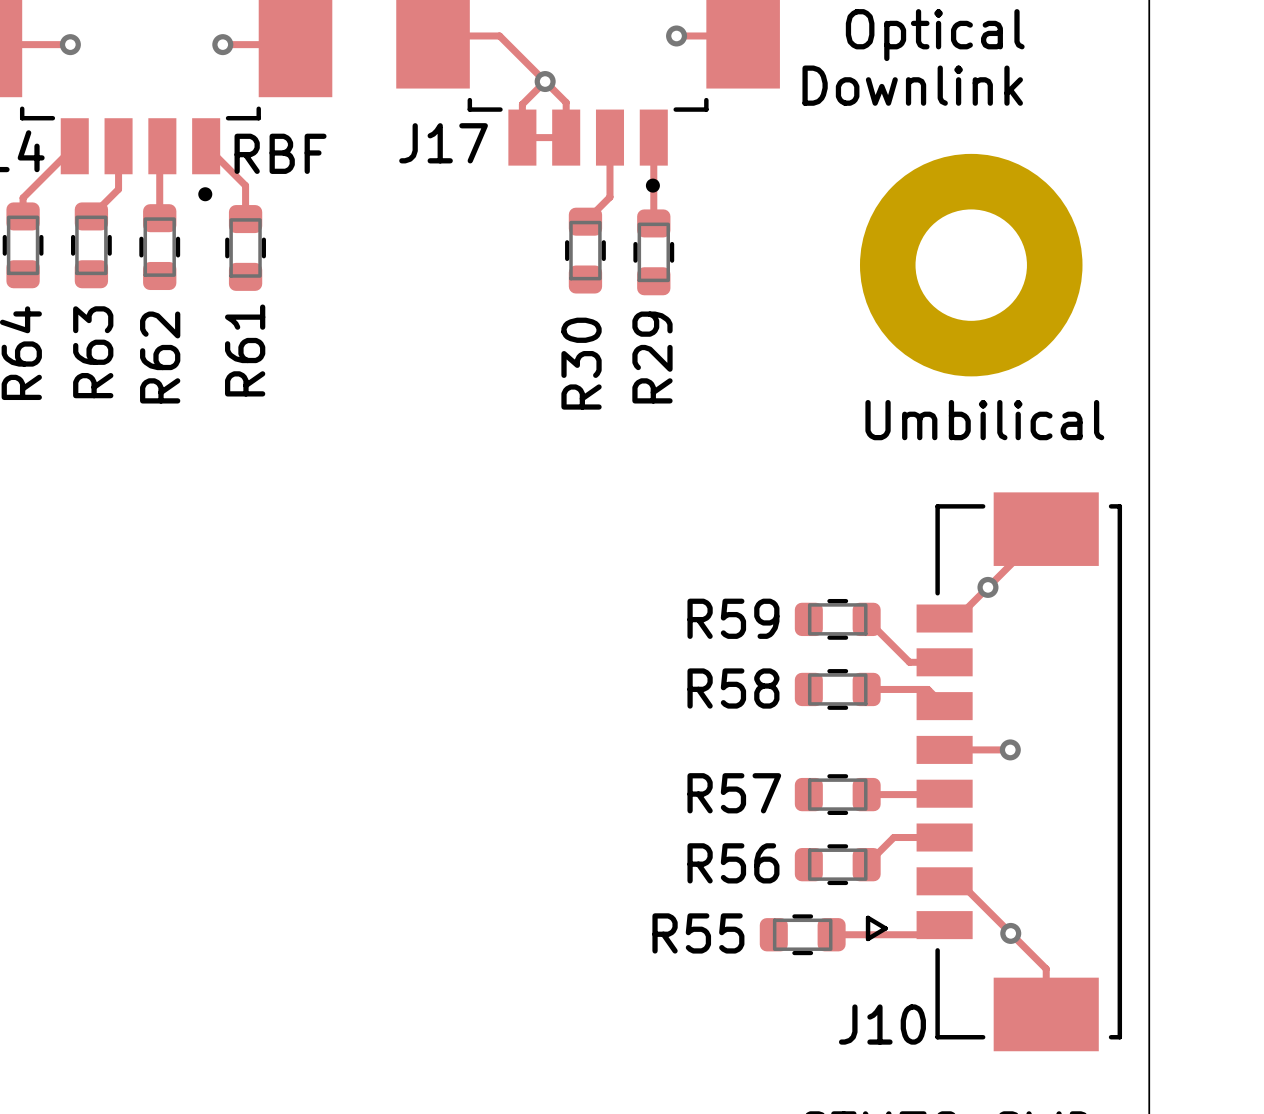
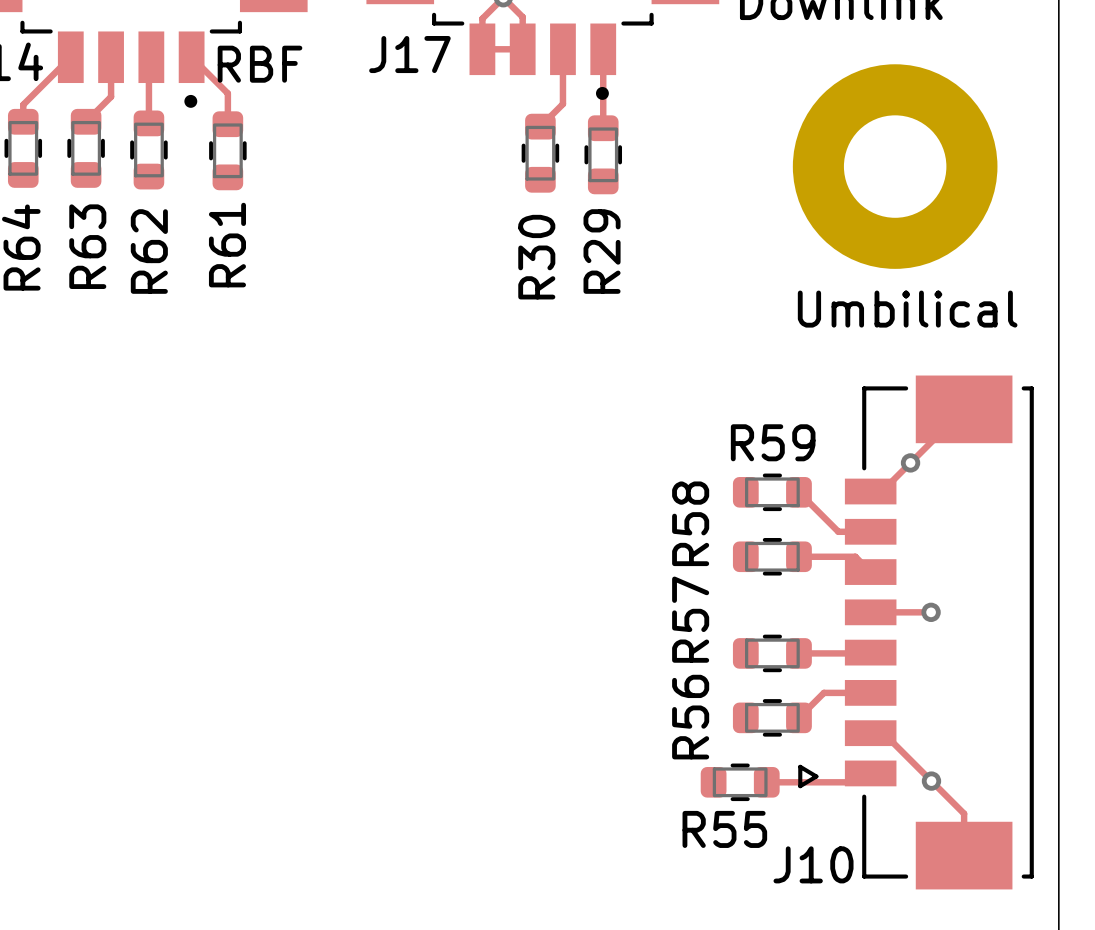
R59 name position: R59 (733, 618) -> R59 (773, 442)
R58 name rotation: 0° (733, 688) -> 90° counterclockwise (690, 523)
R57 name rotation: 0° (734, 793) -> 90° counterclockwise (690, 619)
R56 name rotation: 0° (733, 863) -> 90° counterclockwise (690, 717)
R55 name position: R55 (698, 933) -> R55 (724, 829)

